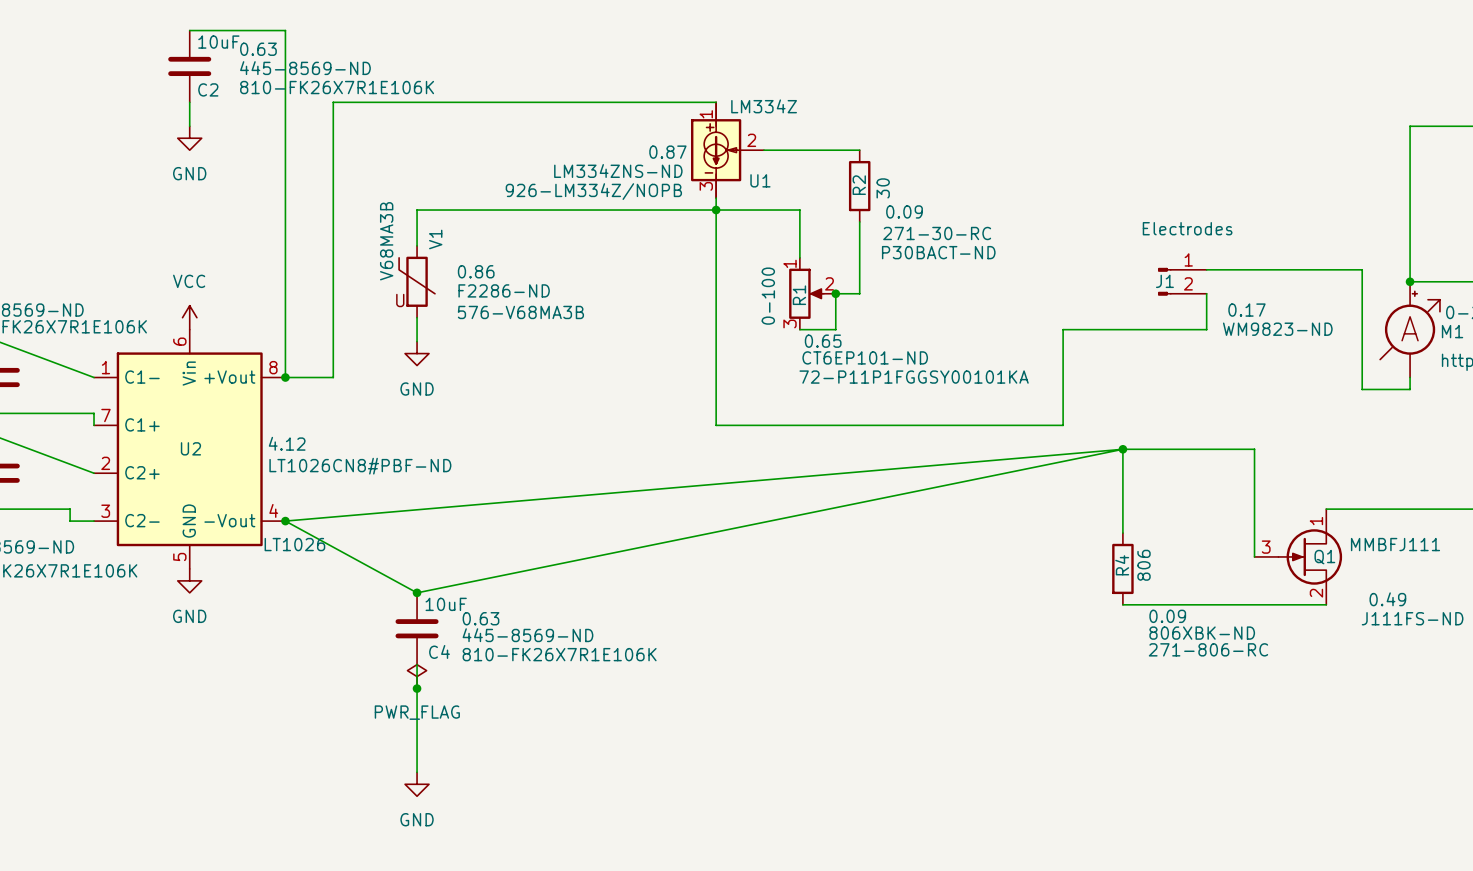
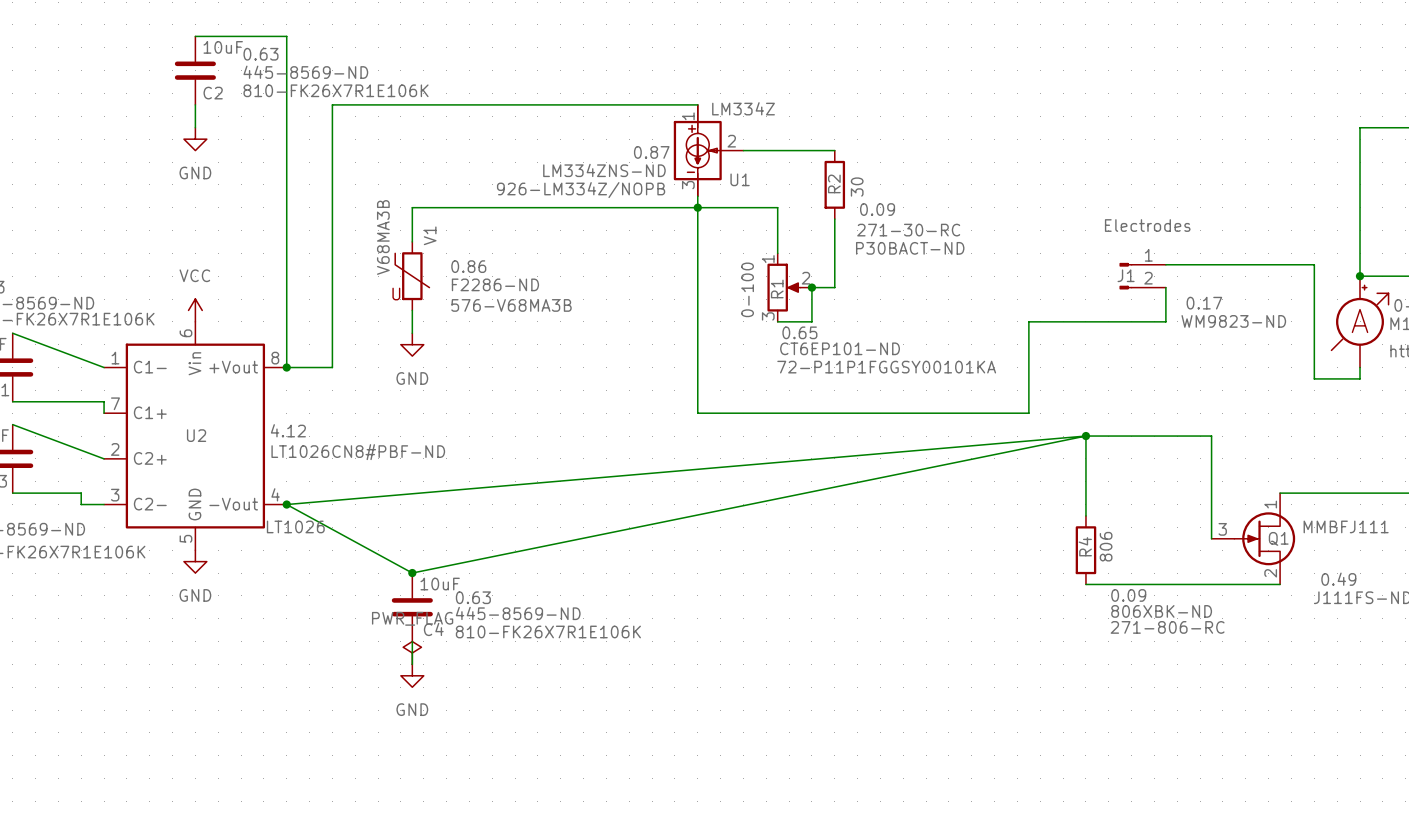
wire: (417, 688) (417, 772) -> none
junction: (417, 688) -> none
power symbol text position: PWR_FLAG (417, 712) -> PWR_FLAG (412, 618)
power symbol position: GND (417, 784) -> GND (412, 675)

